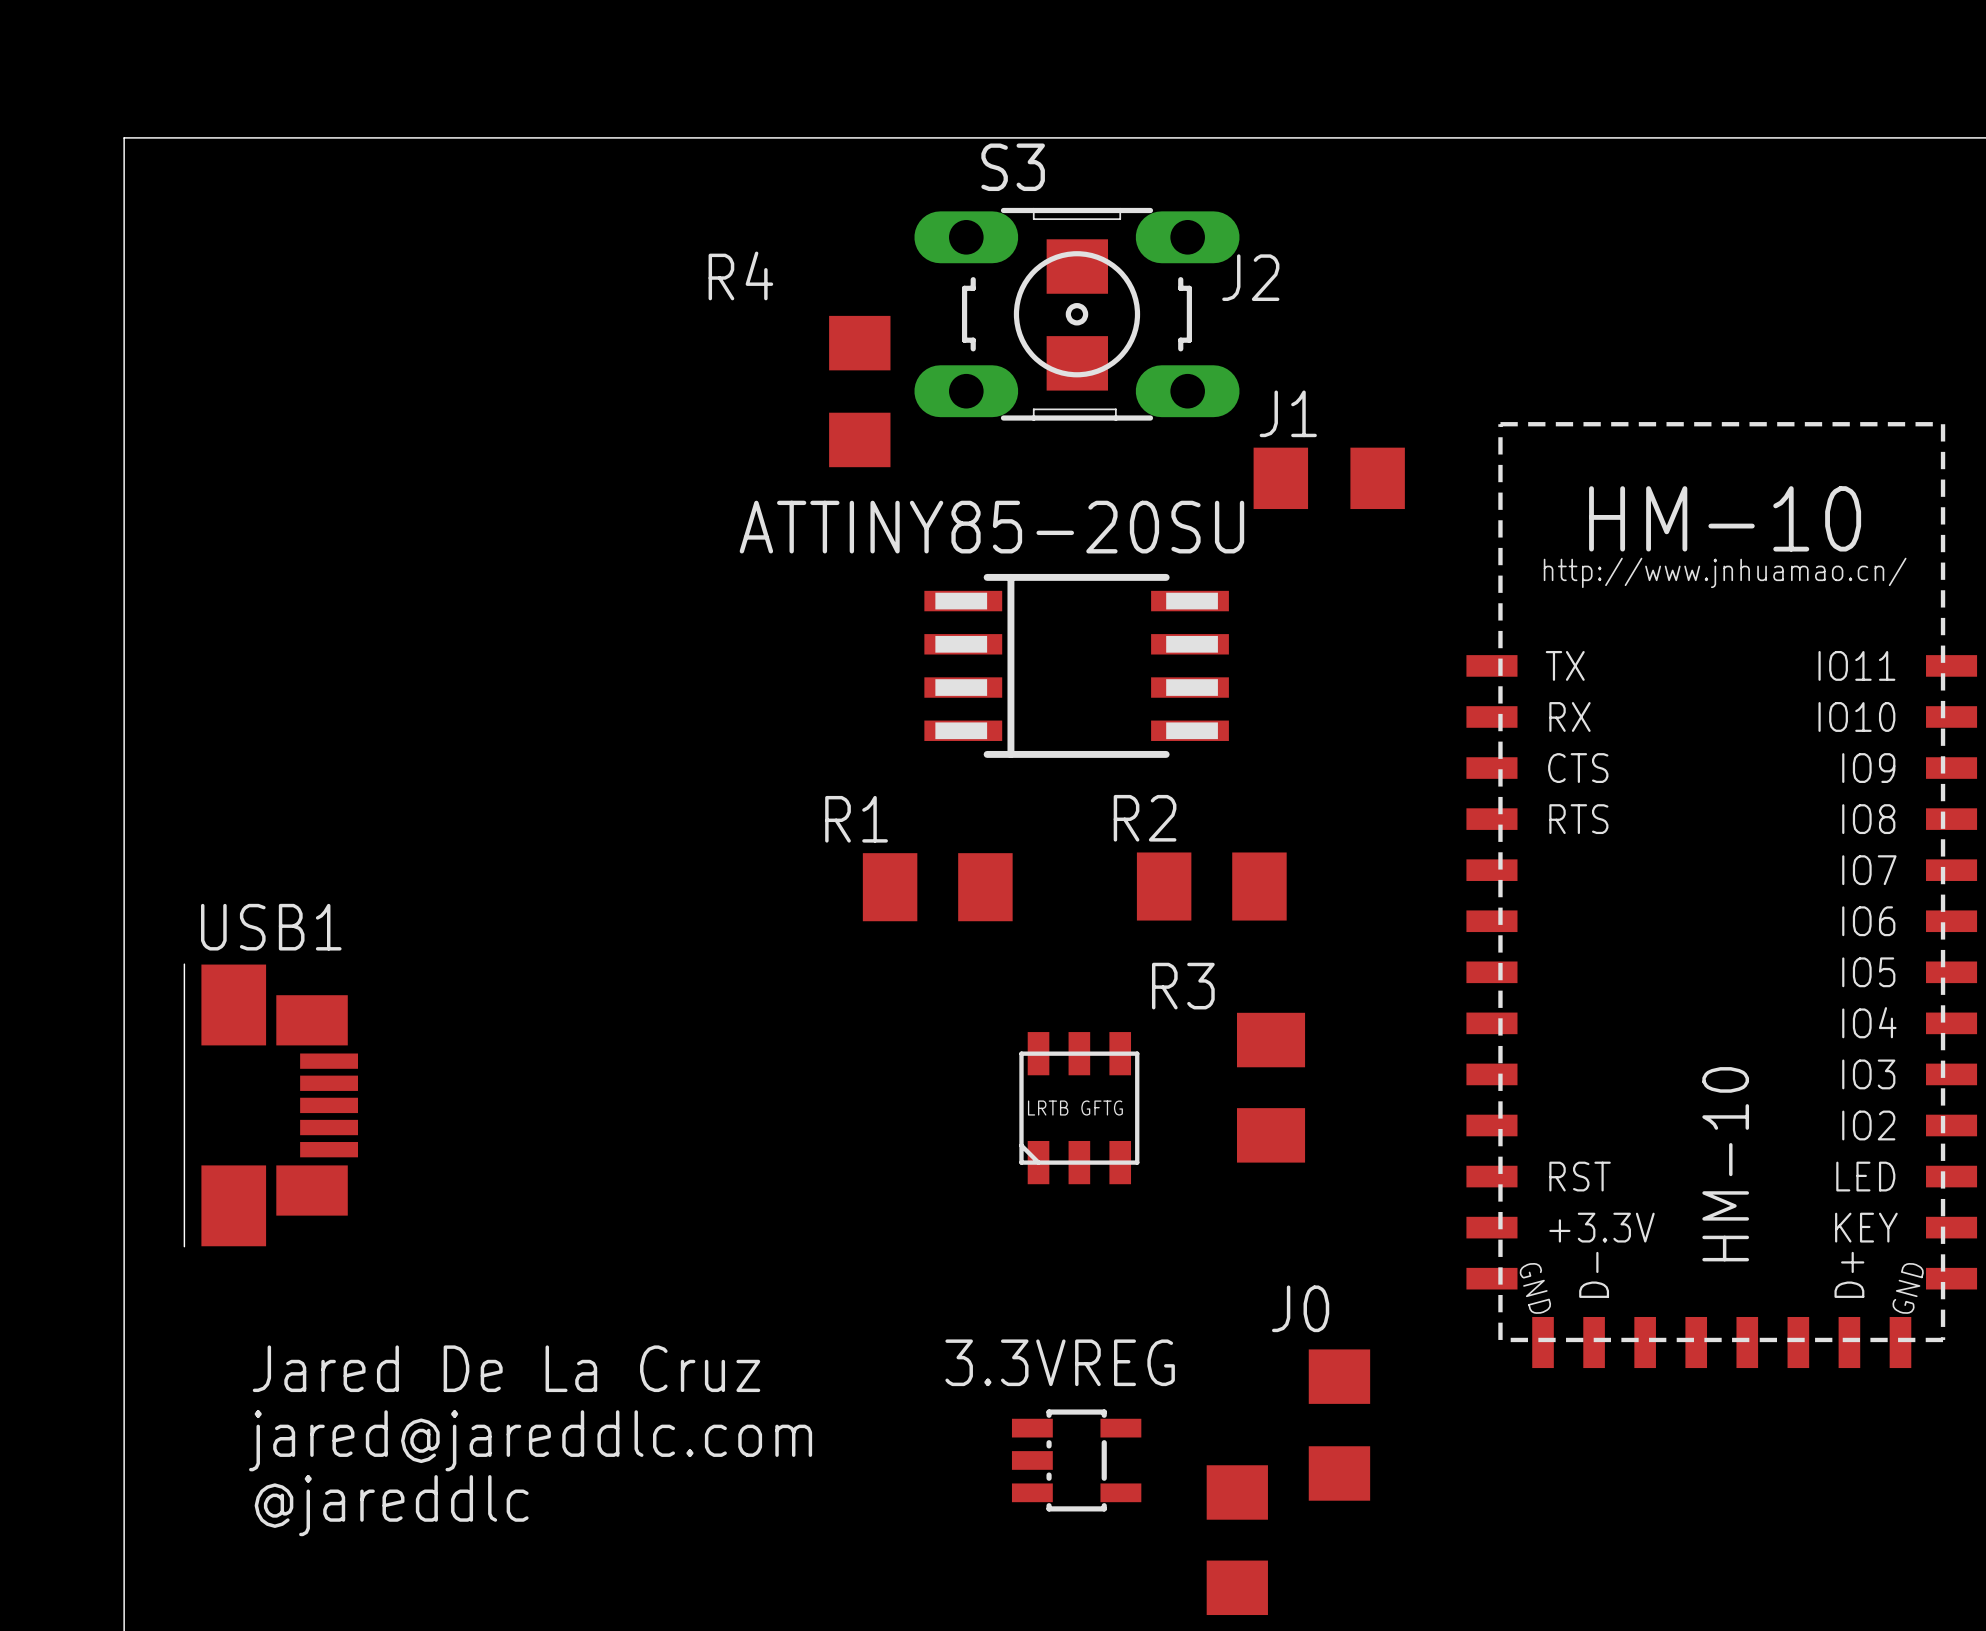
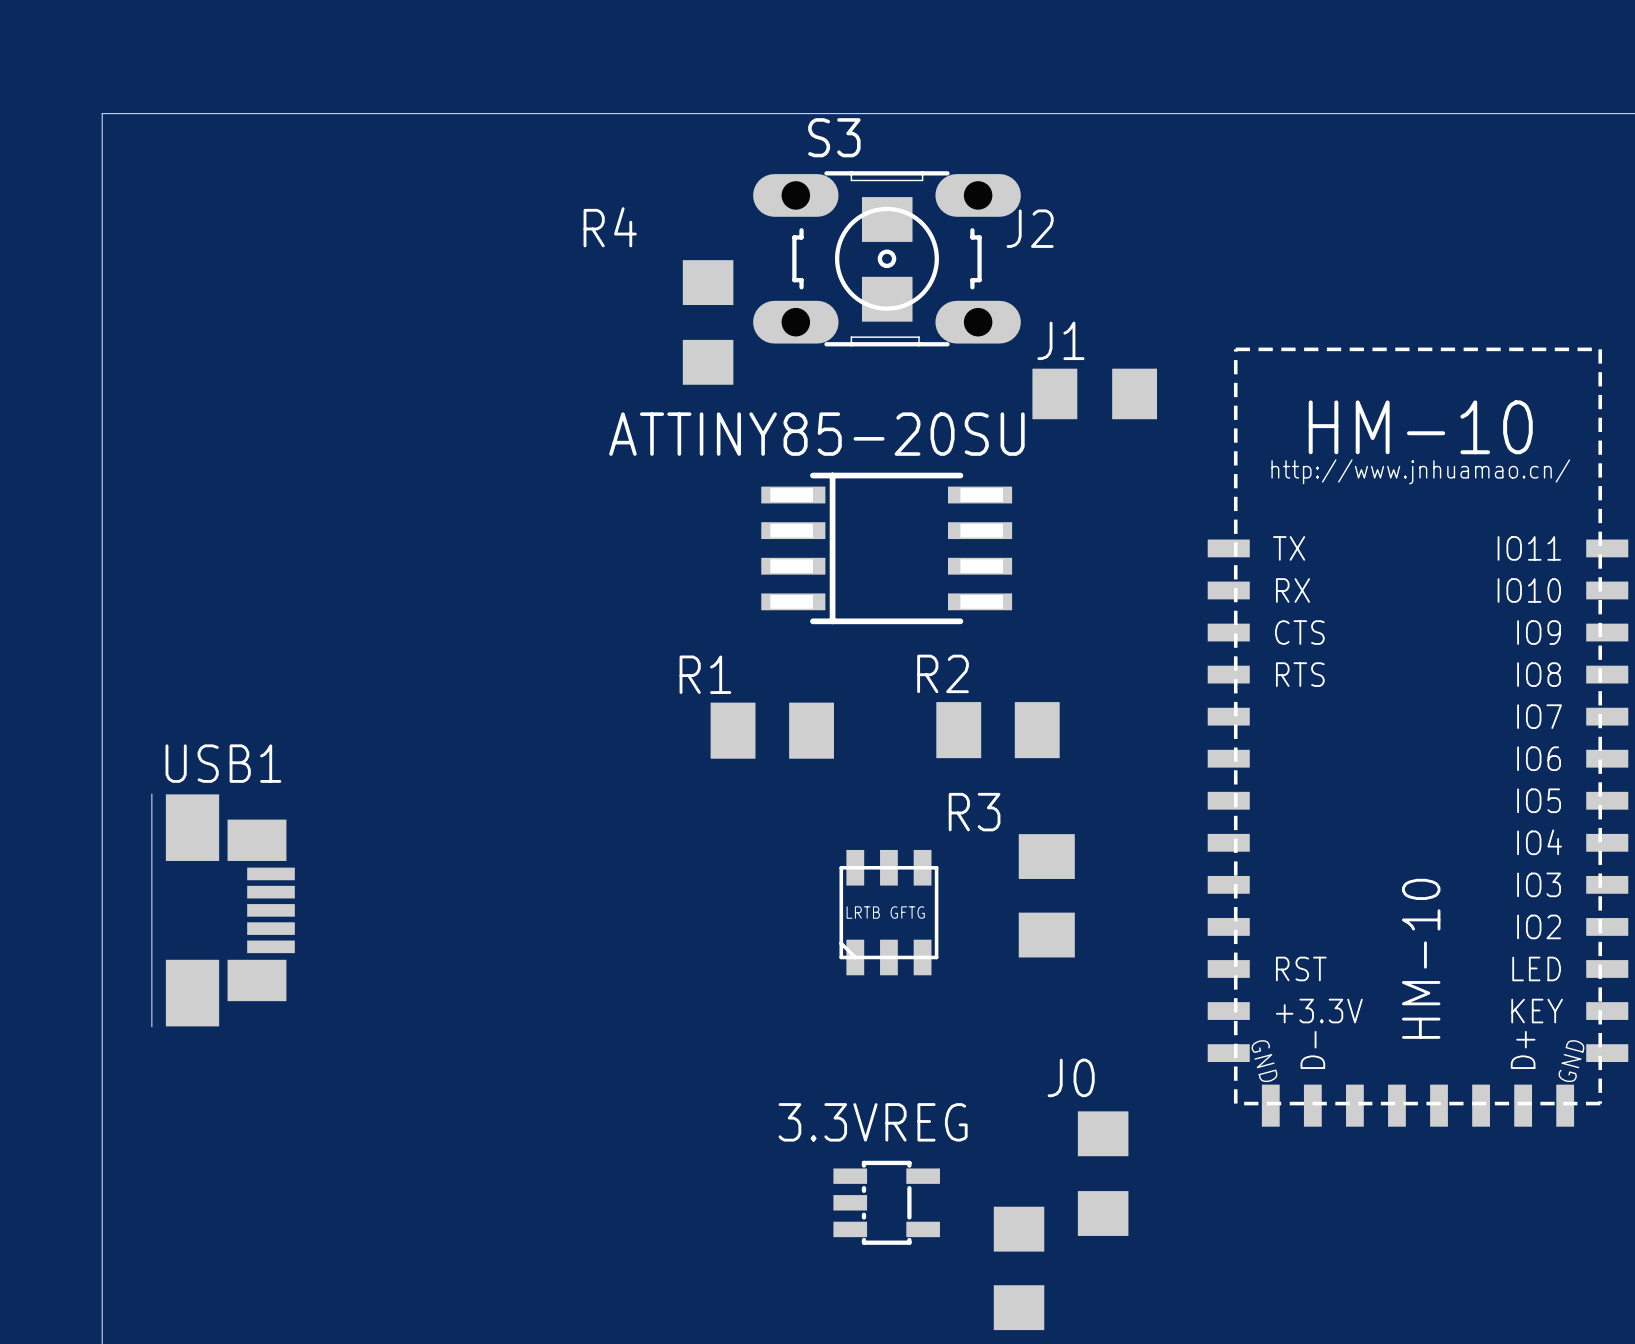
text: Jared De La Cruz (506, 1368) -> none
text: jared@jareddlc.com (530, 1440) -> none
text: @jareddlc (391, 1505) -> none

